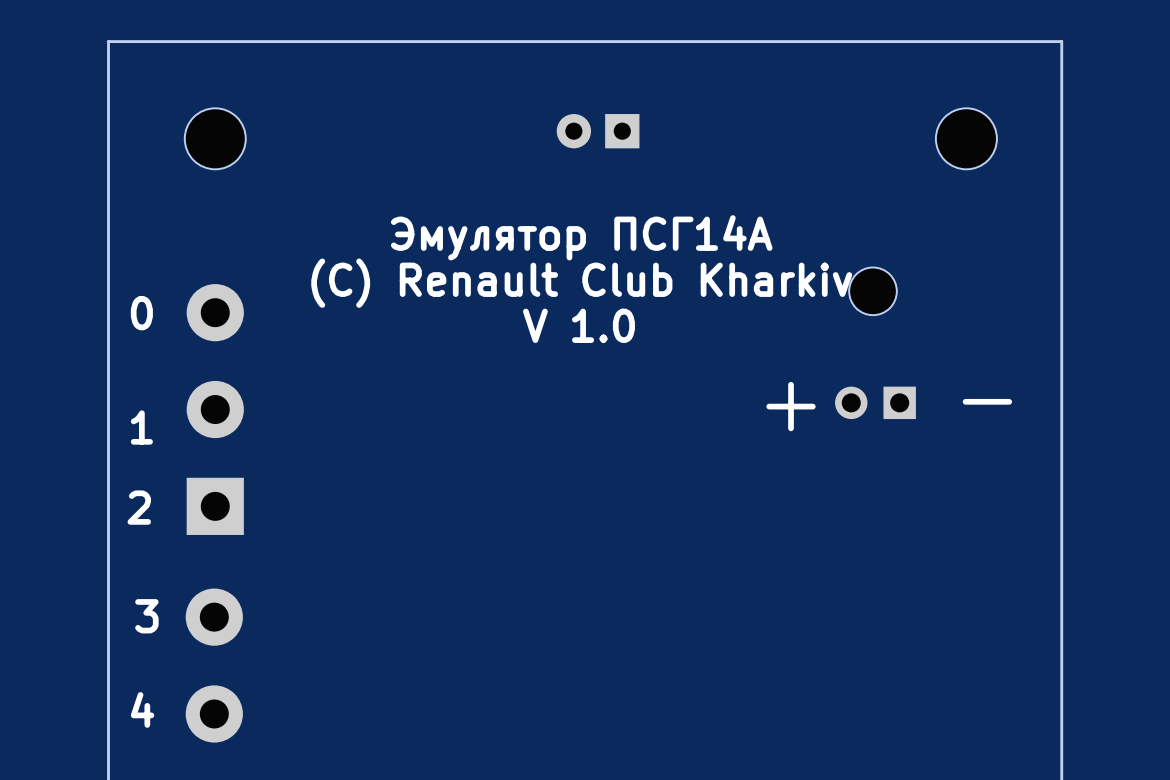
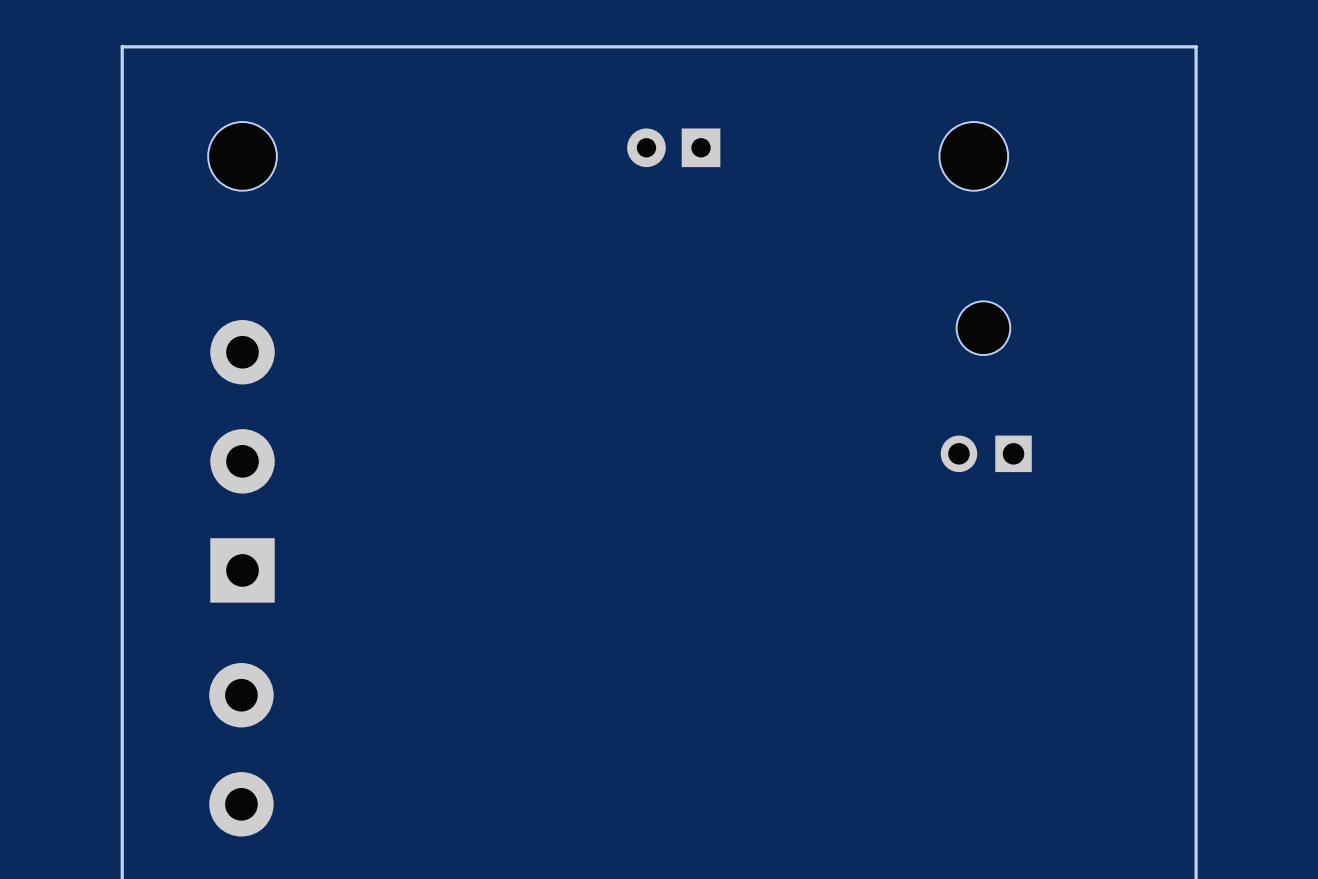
part position: (966, 138) -> (973, 156)
text: Эмулятор ПСГ14А (581, 237) -> none
text: (C) Renault Club Kharkiv (581, 283) -> none
text: 0 (141, 313) -> none
text: V 1.0 (578, 325) -> none
text: - (987, 401) -> none
text: + (791, 406) -> none
text: 1 (141, 427) -> none
text: 2 (139, 507) -> none
text: 3 (146, 616) -> none
text: 4 (142, 709) -> none

